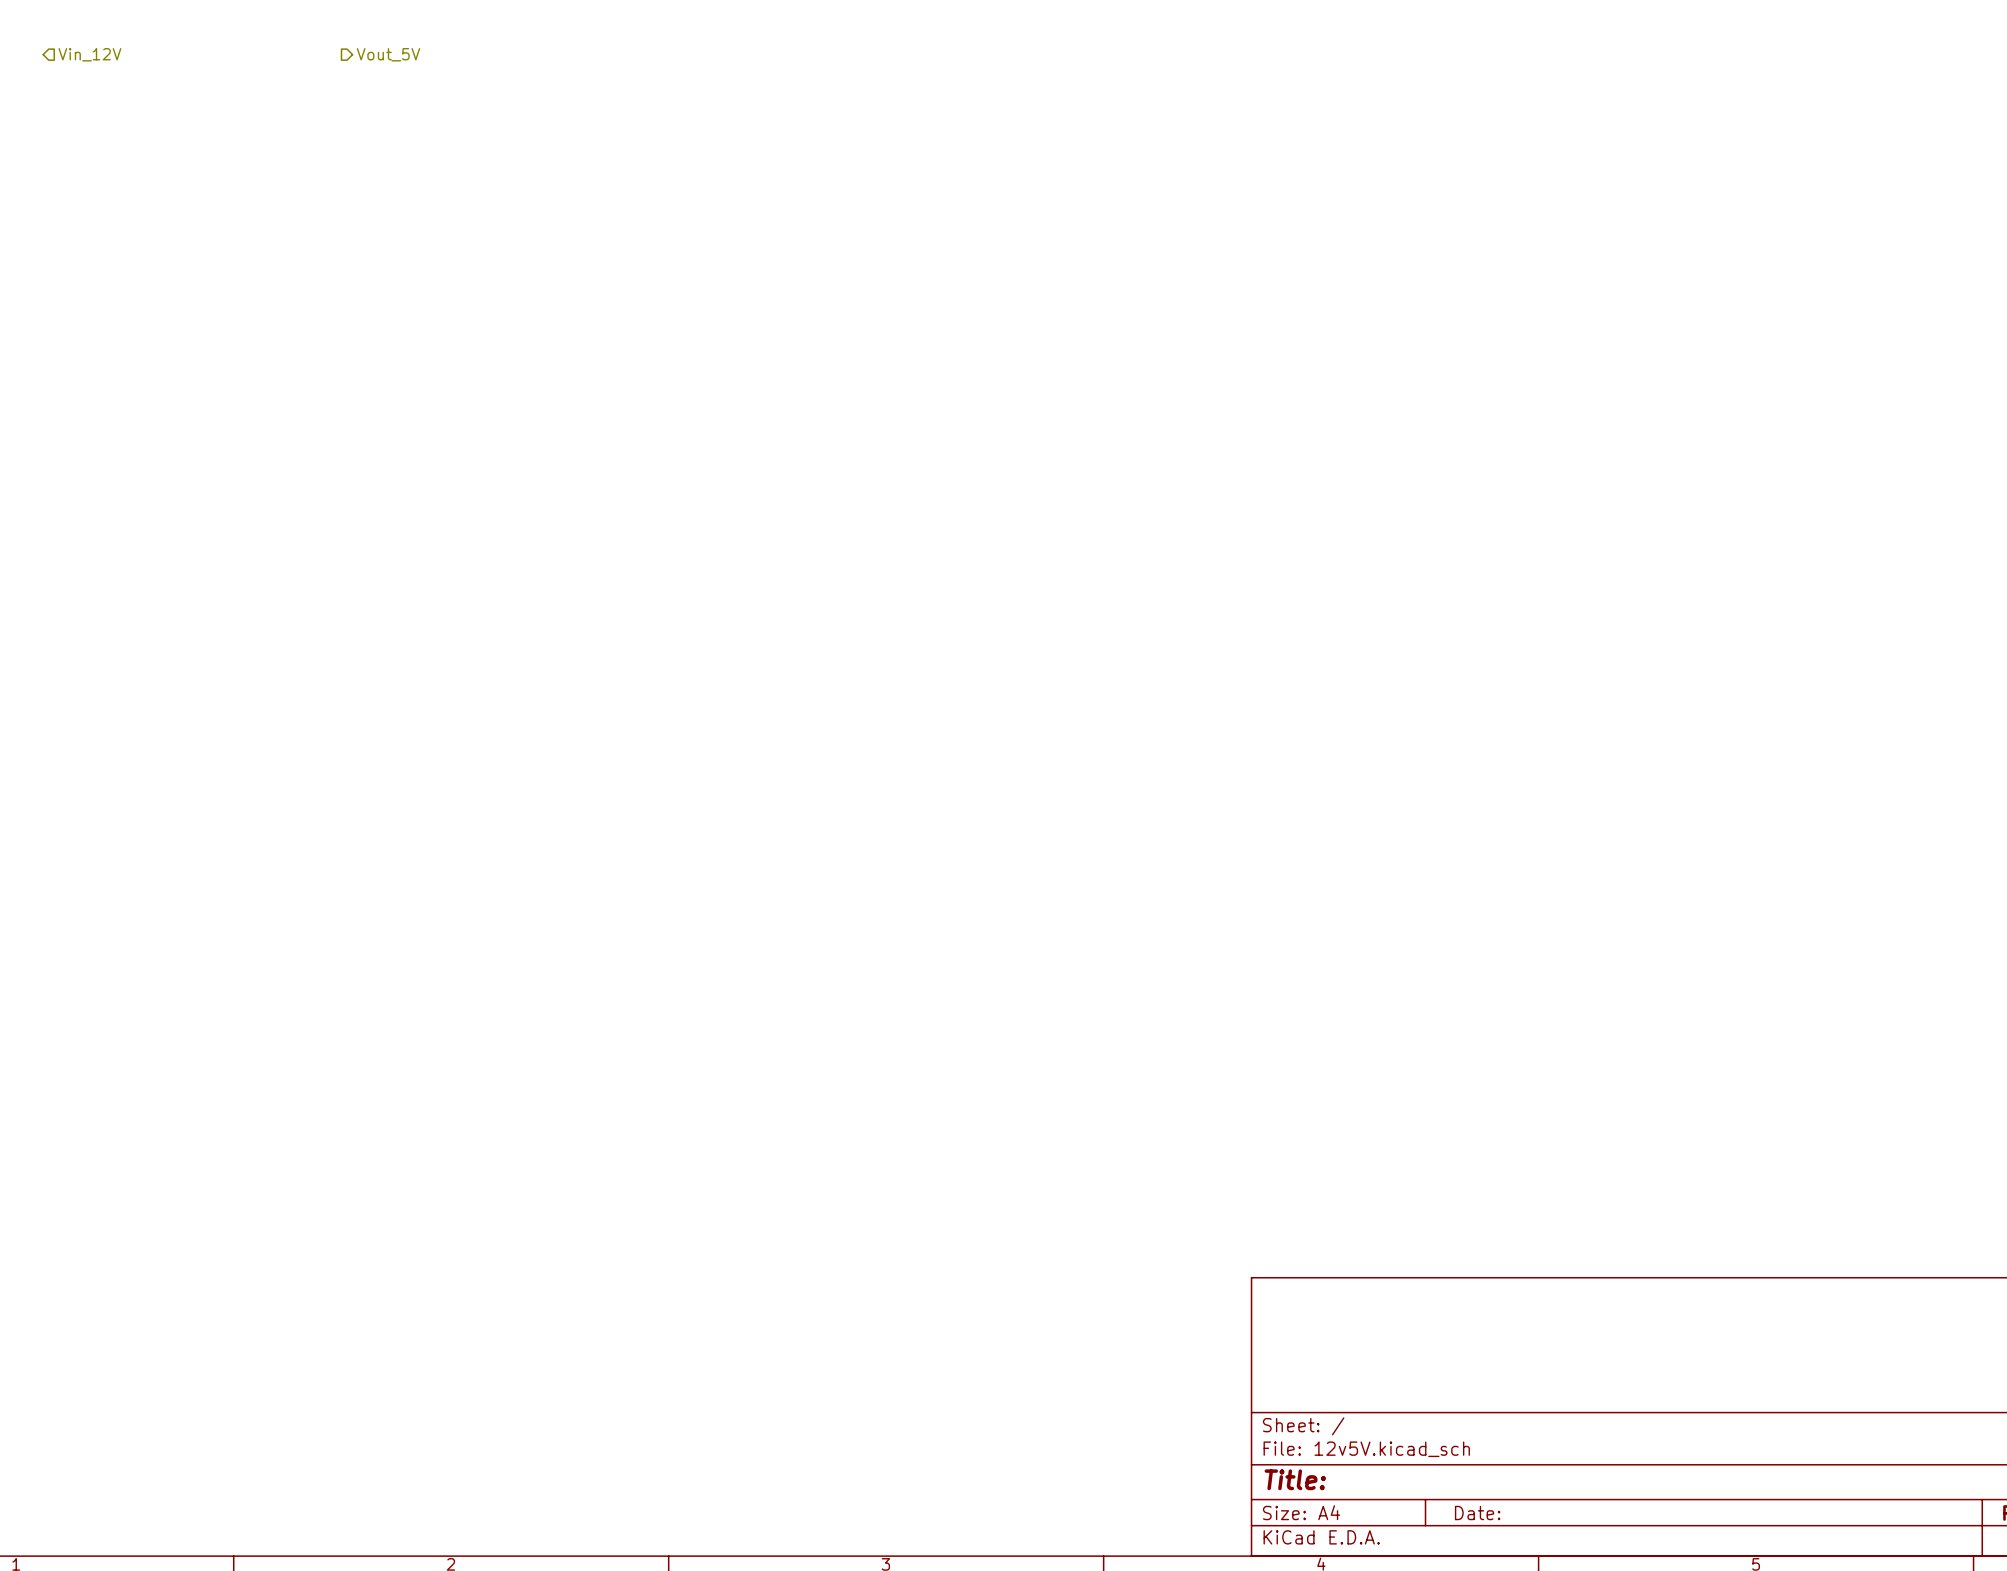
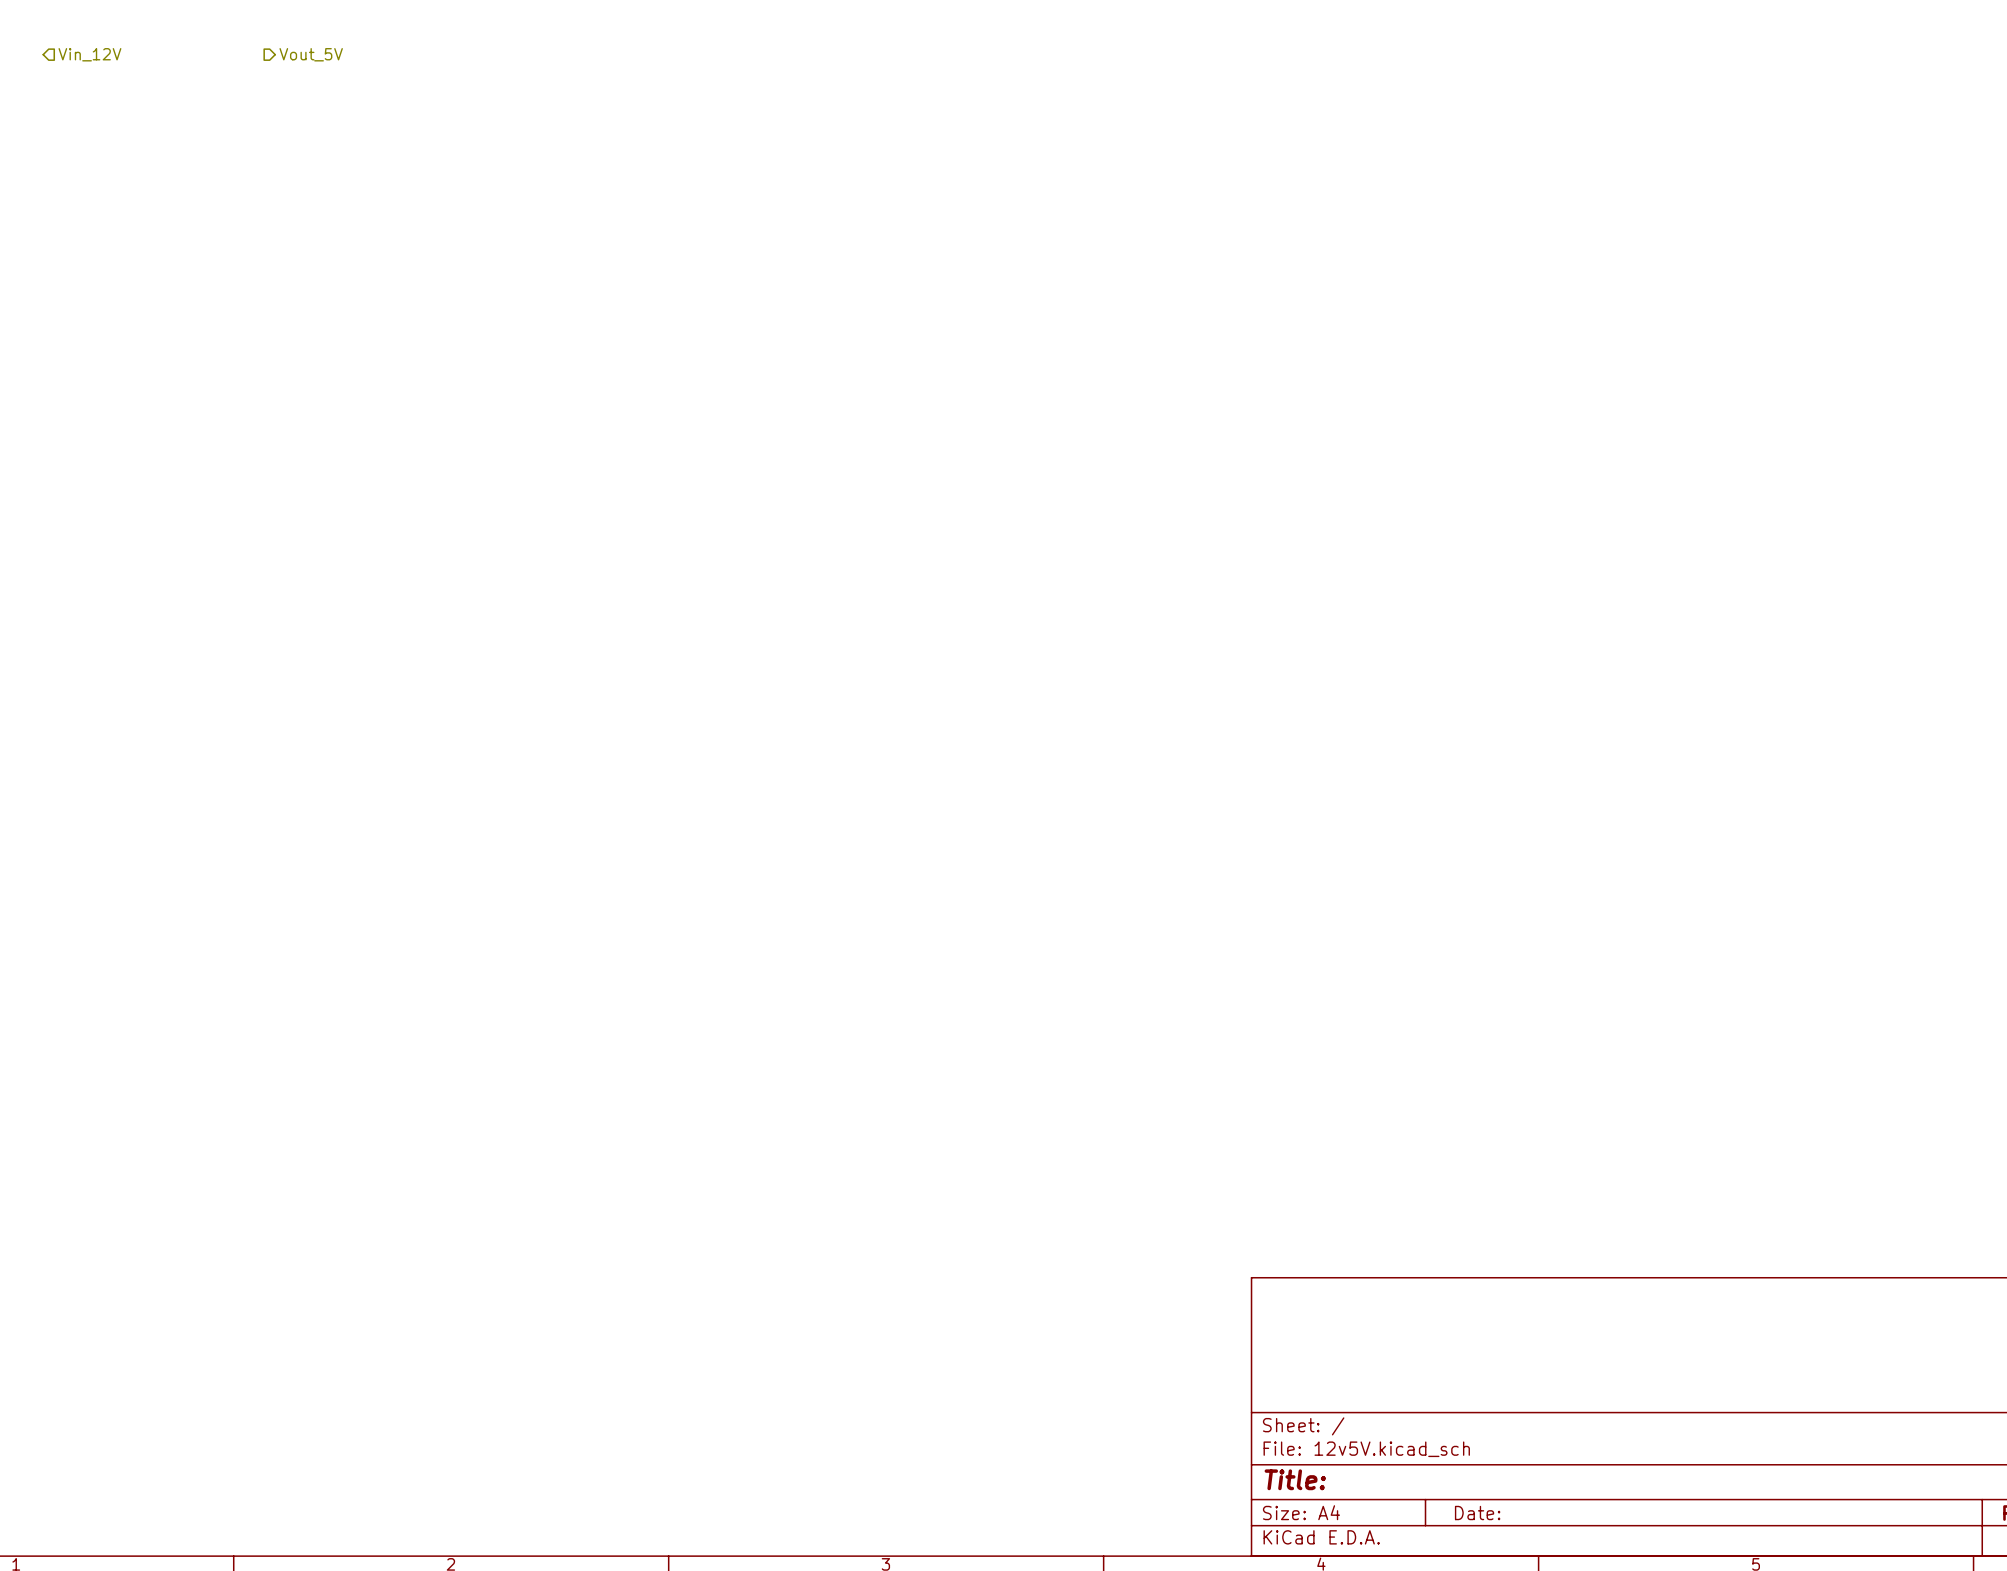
hierarchical label position: Vout_5V (388, 54) -> Vout_5V (311, 54)

